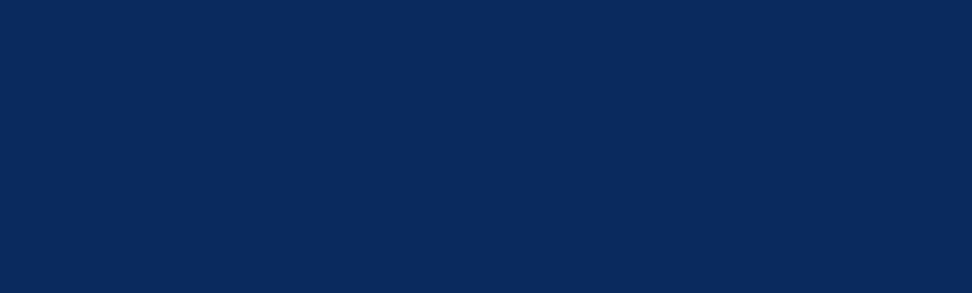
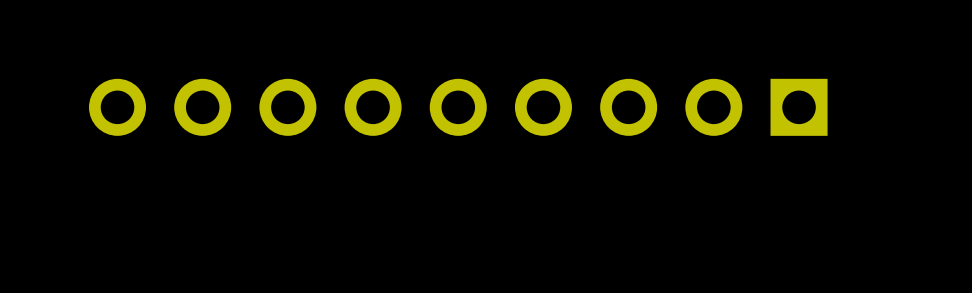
part: none -> (458, 107)

